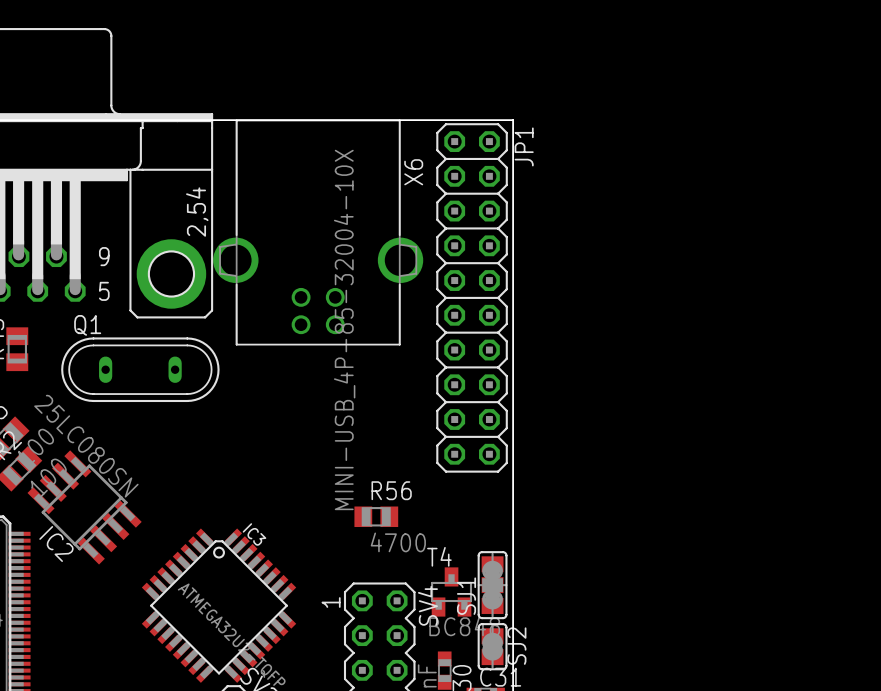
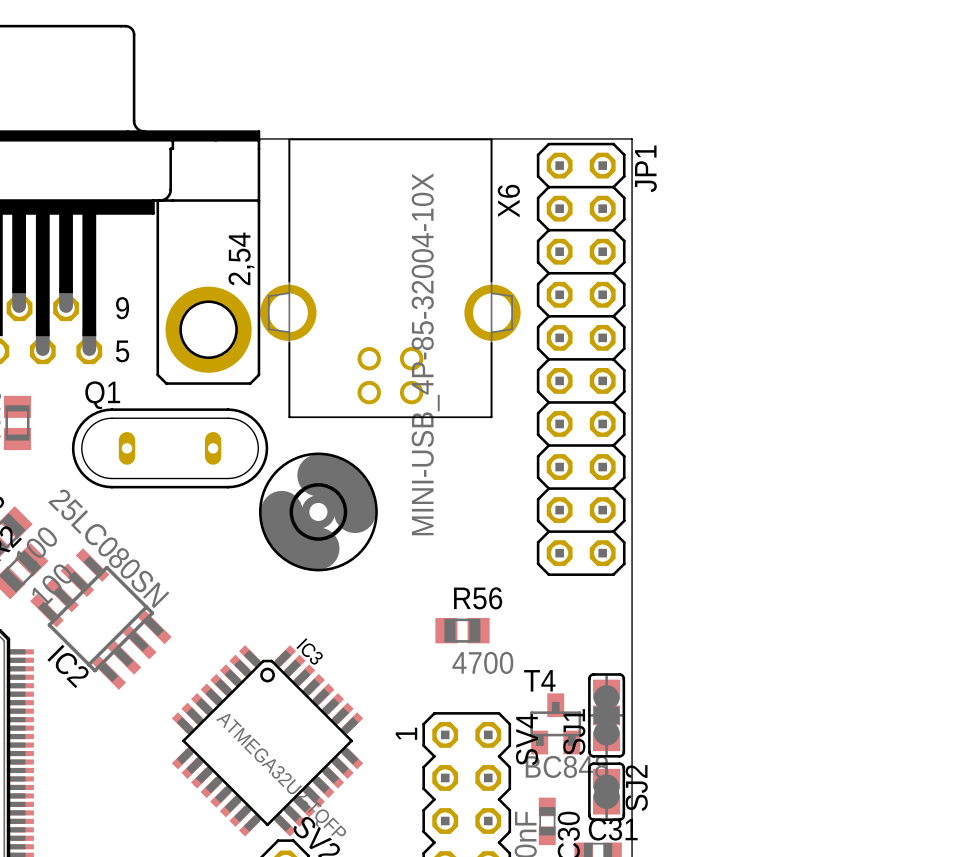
part: none -> (318, 511)

